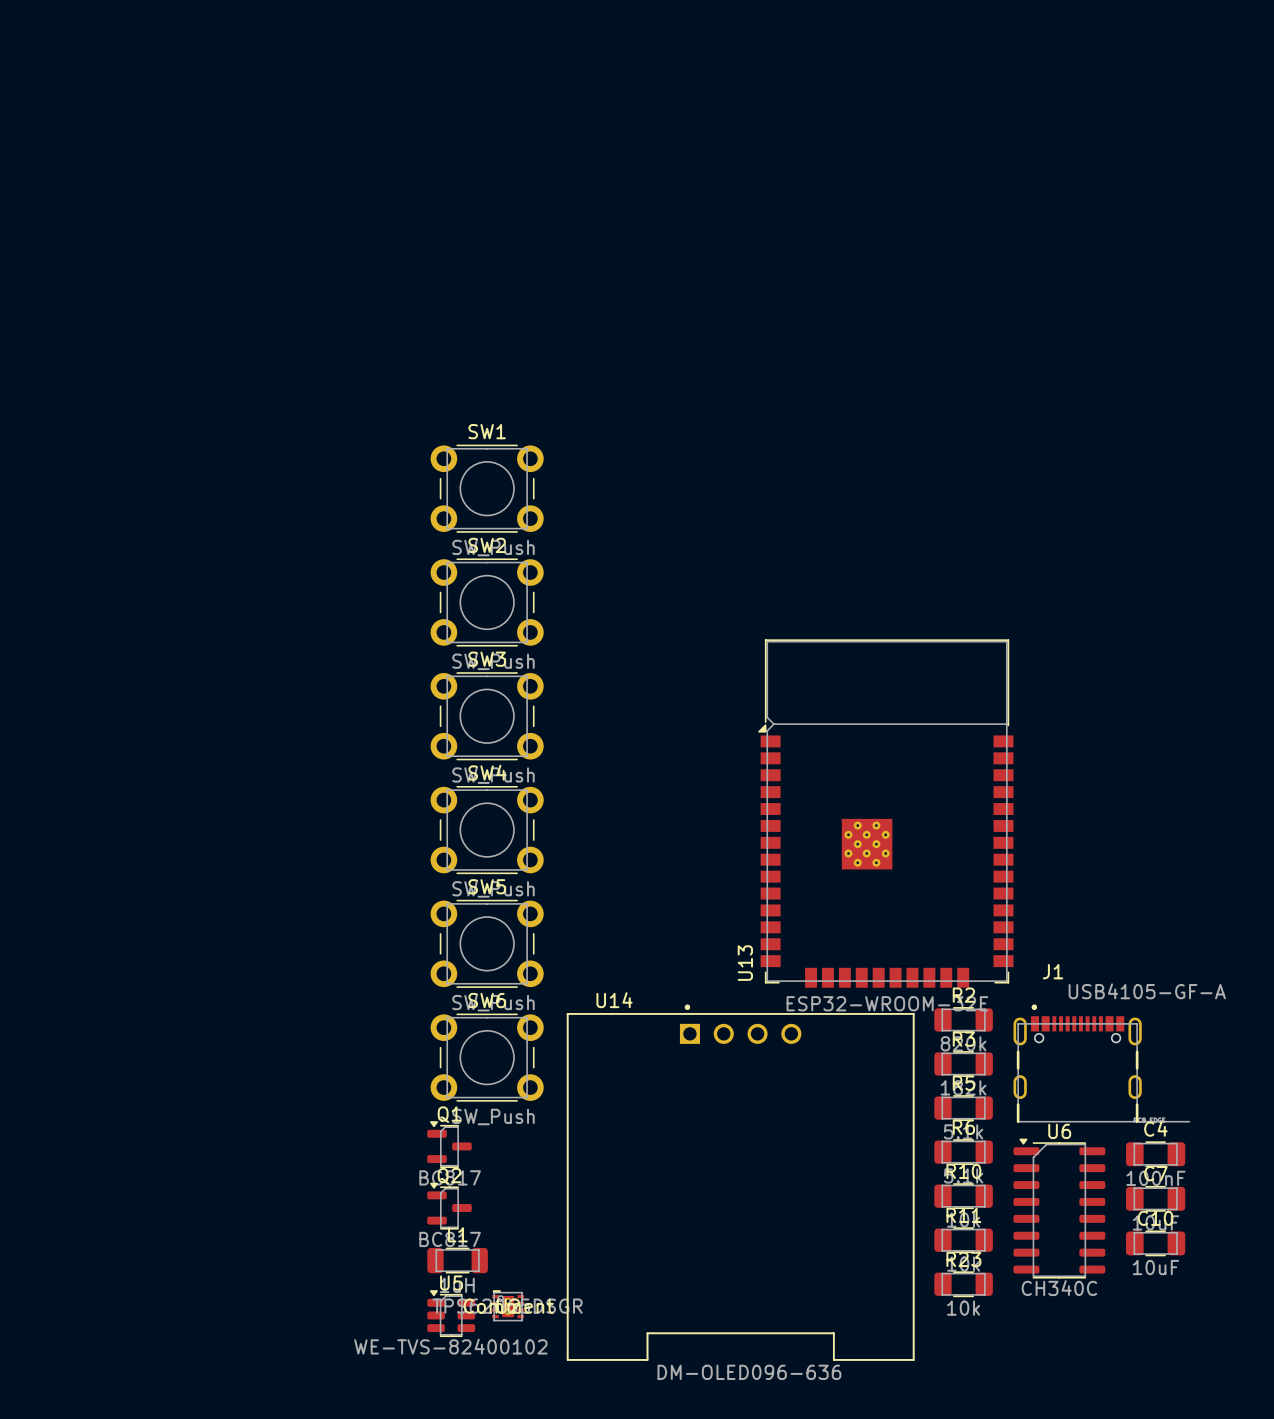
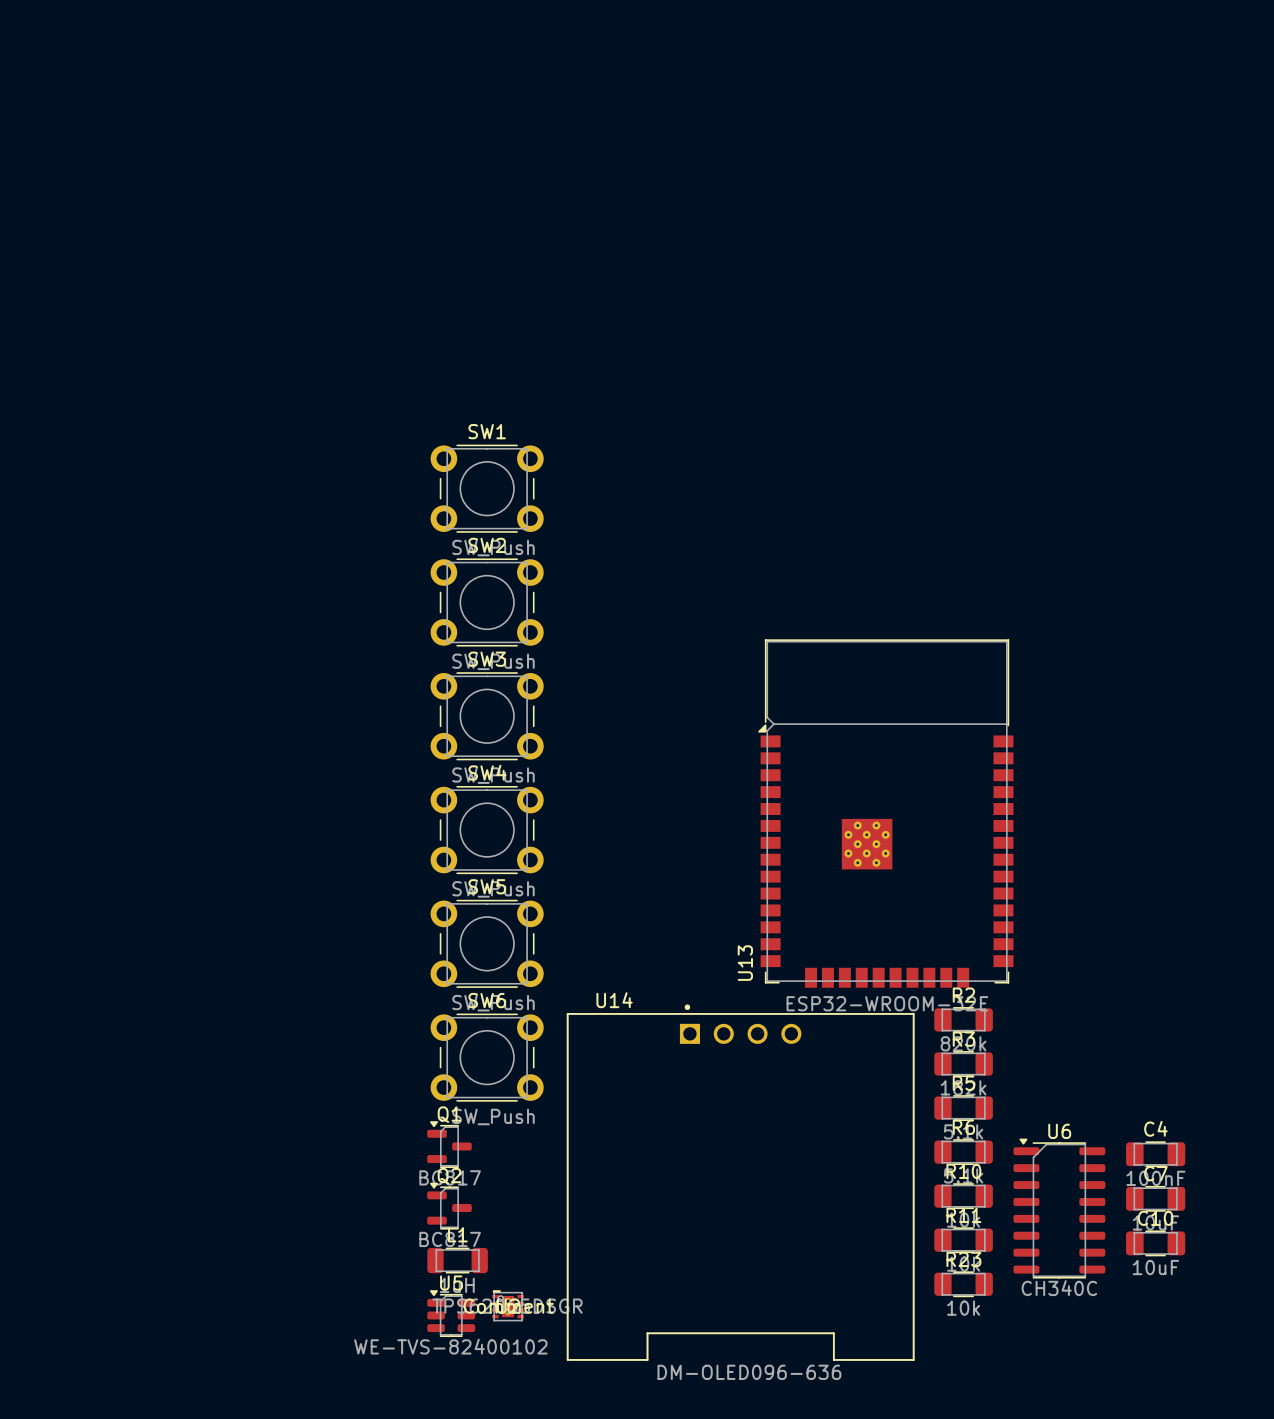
J1: USB4105-GF-A (1101, 1063) -> none

